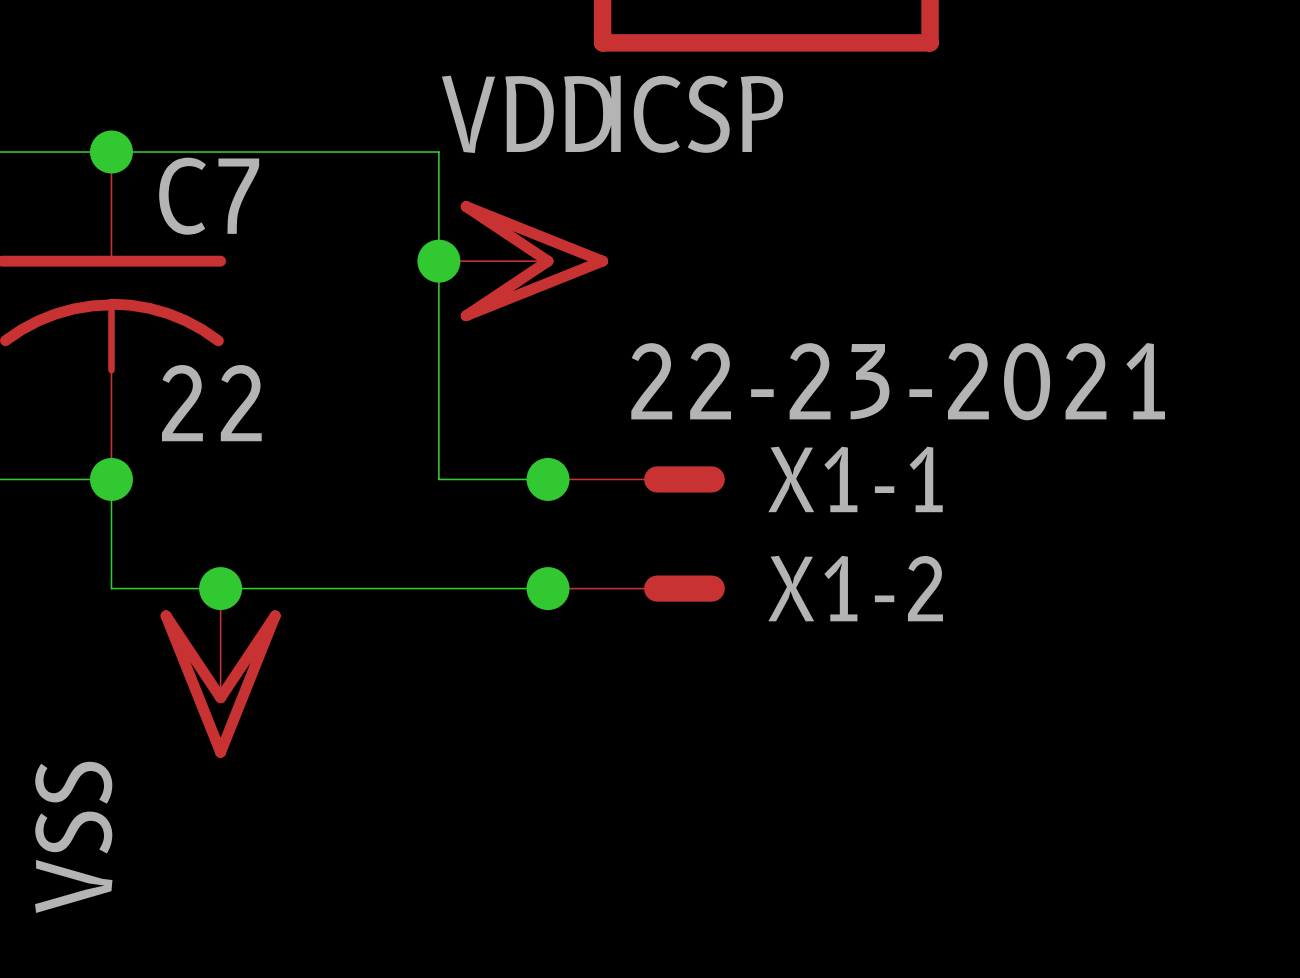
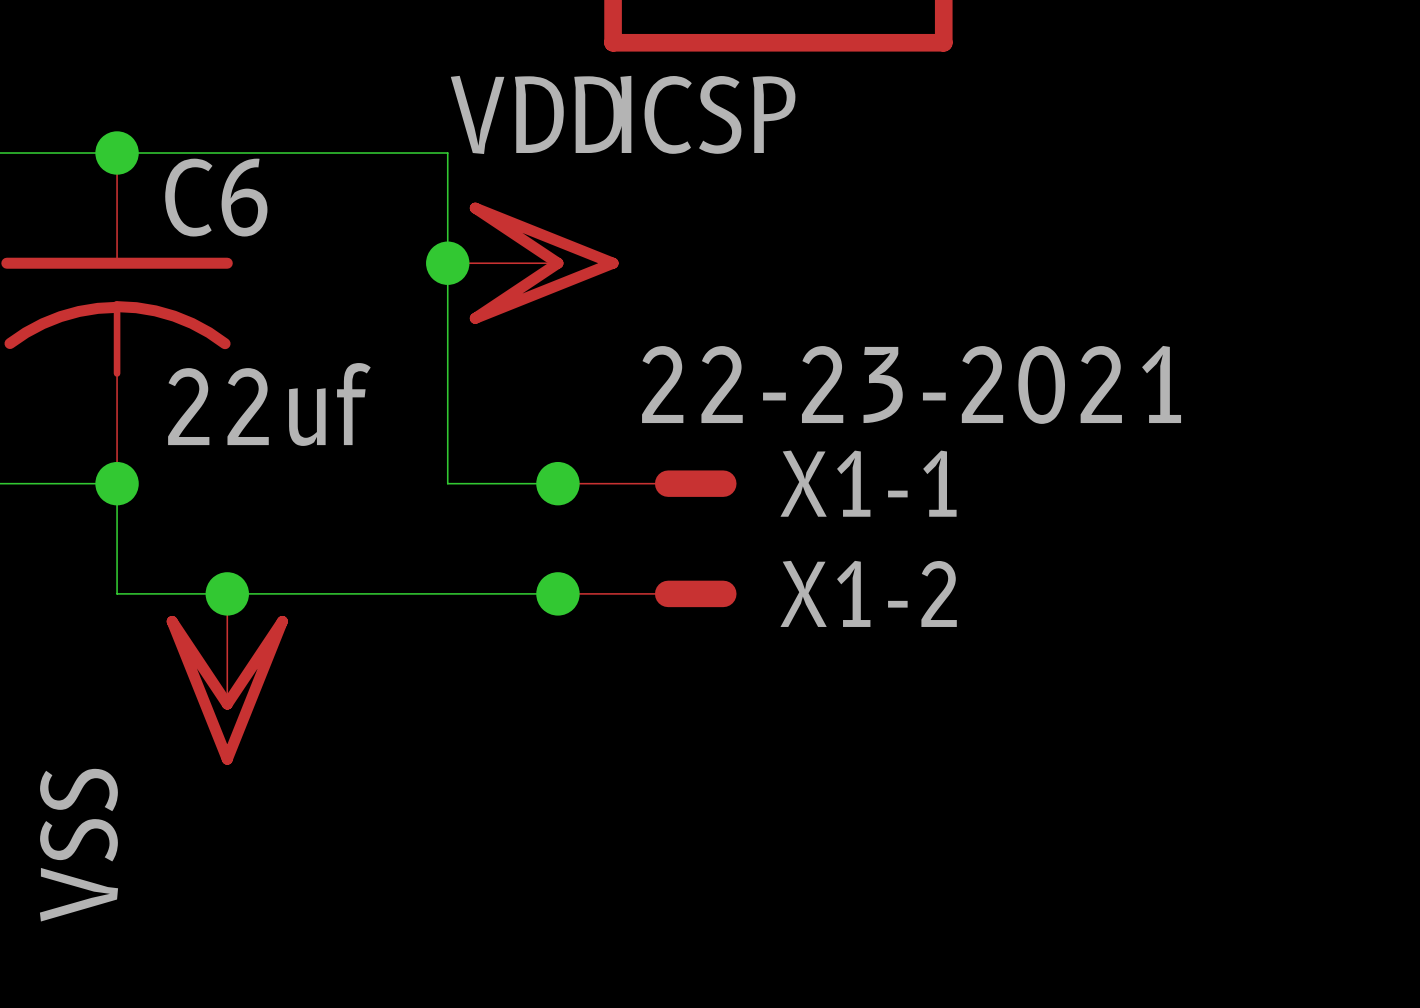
C7 name: C7 (209, 196) -> C6 (216, 197)
C7 value: 22 (211, 403) -> 22uf (269, 404)

